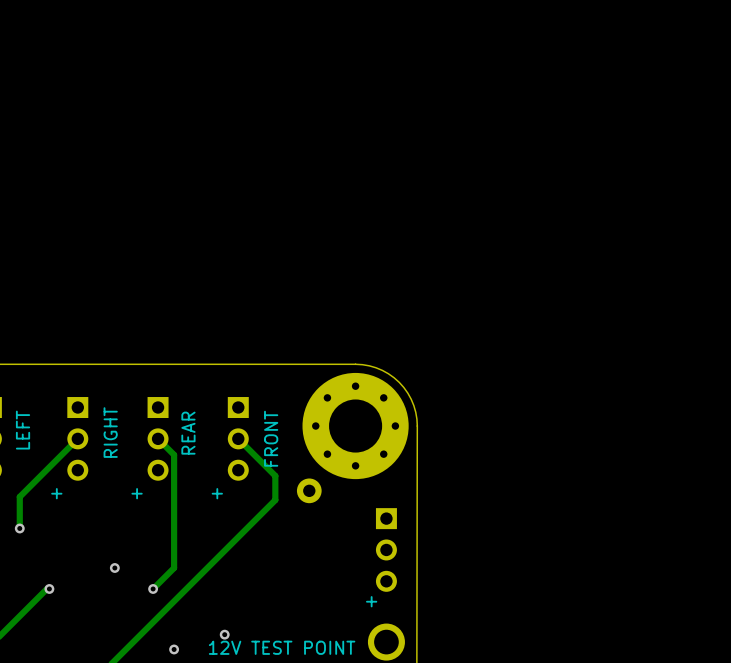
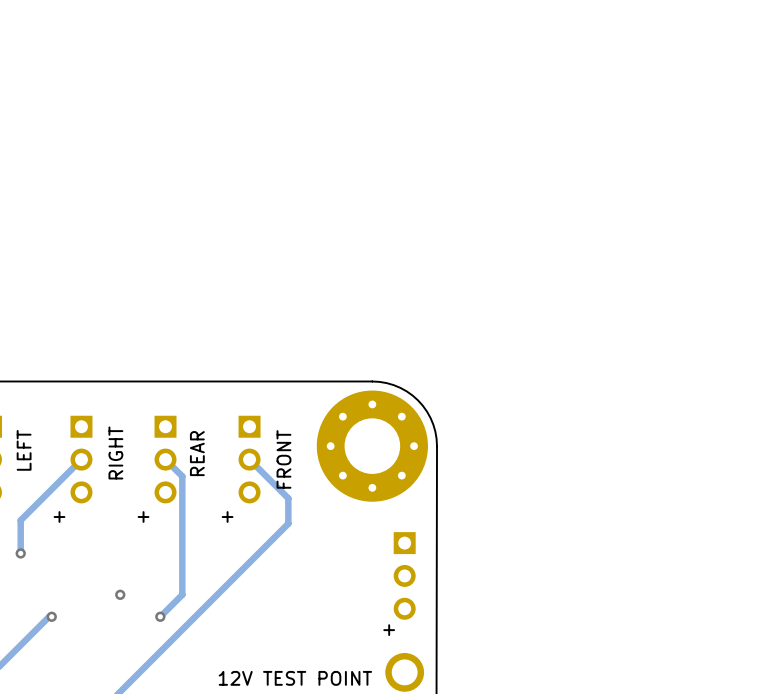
part: (309, 490) -> none
via: (224, 634) -> none
via: (174, 649) -> none

